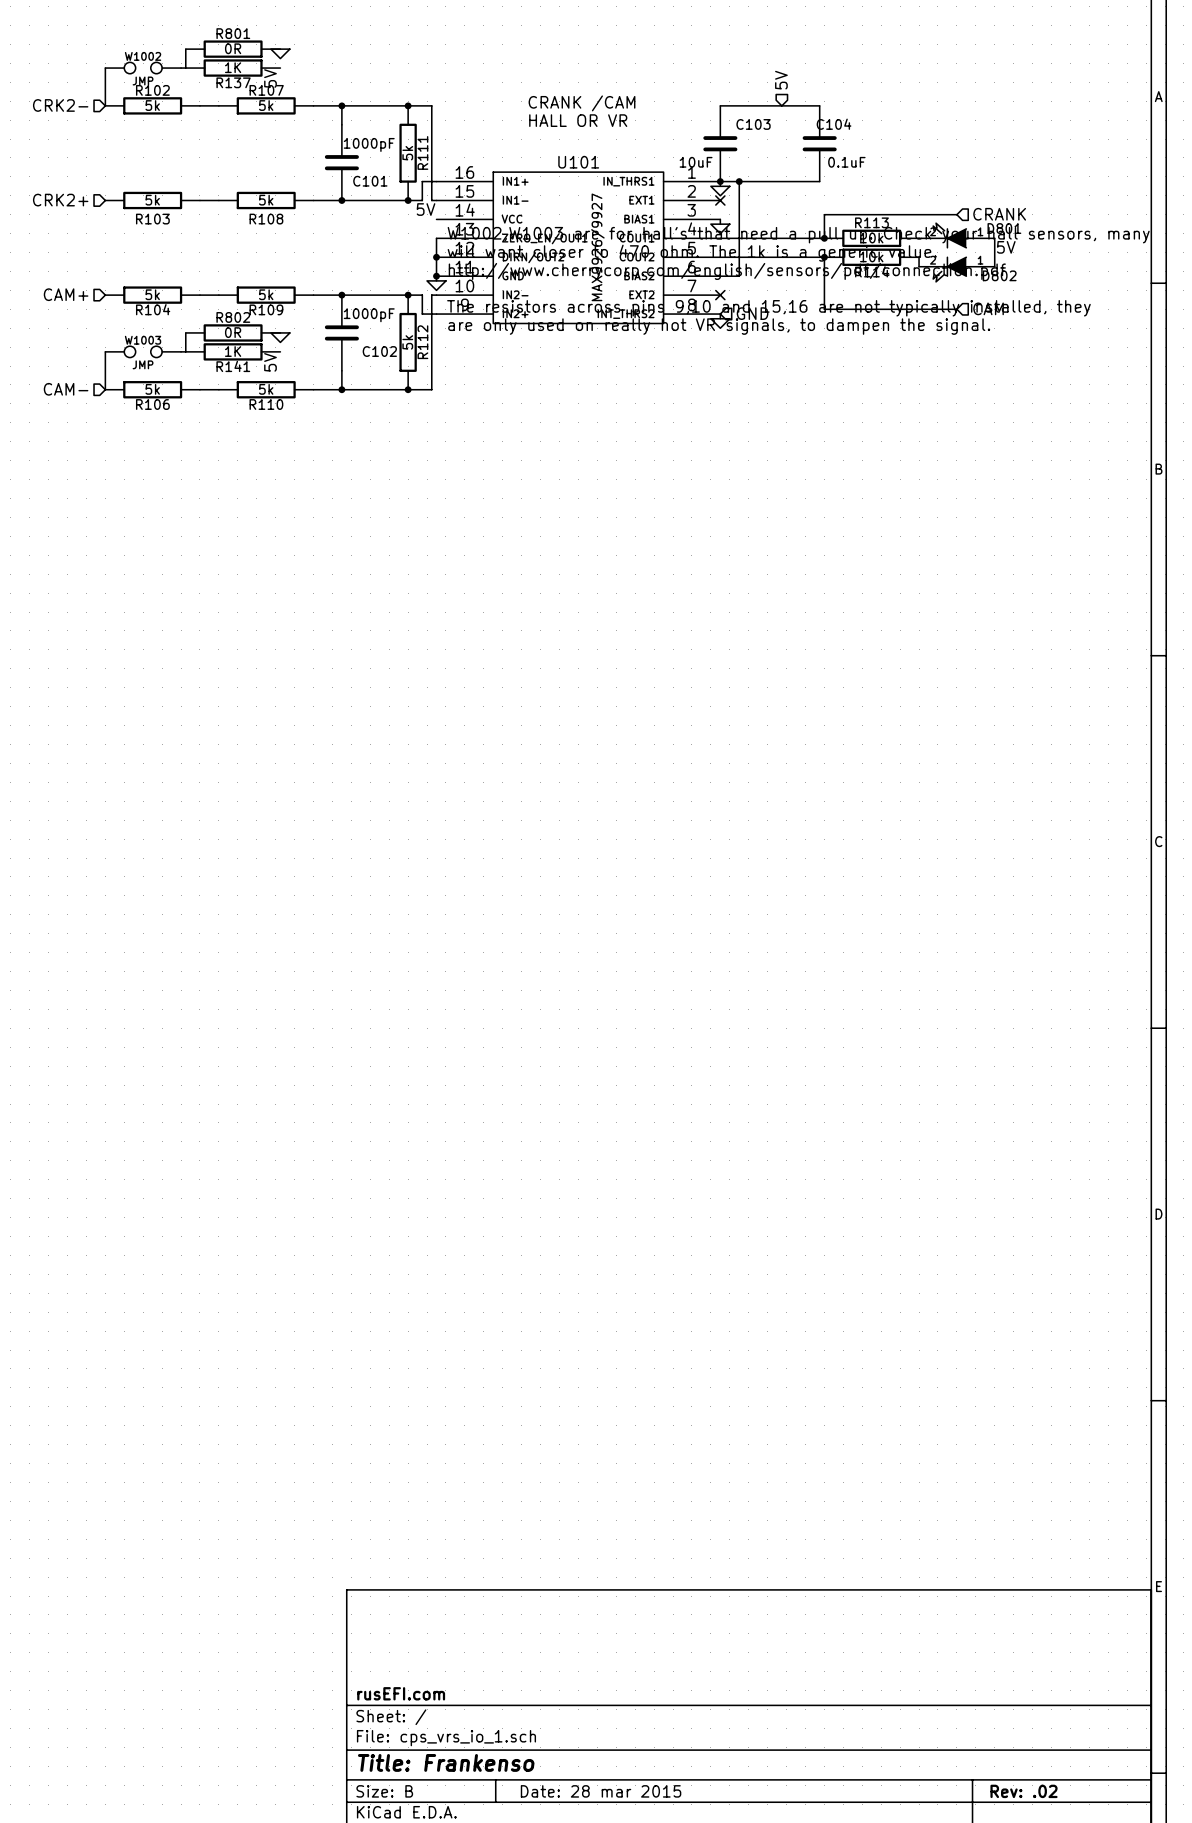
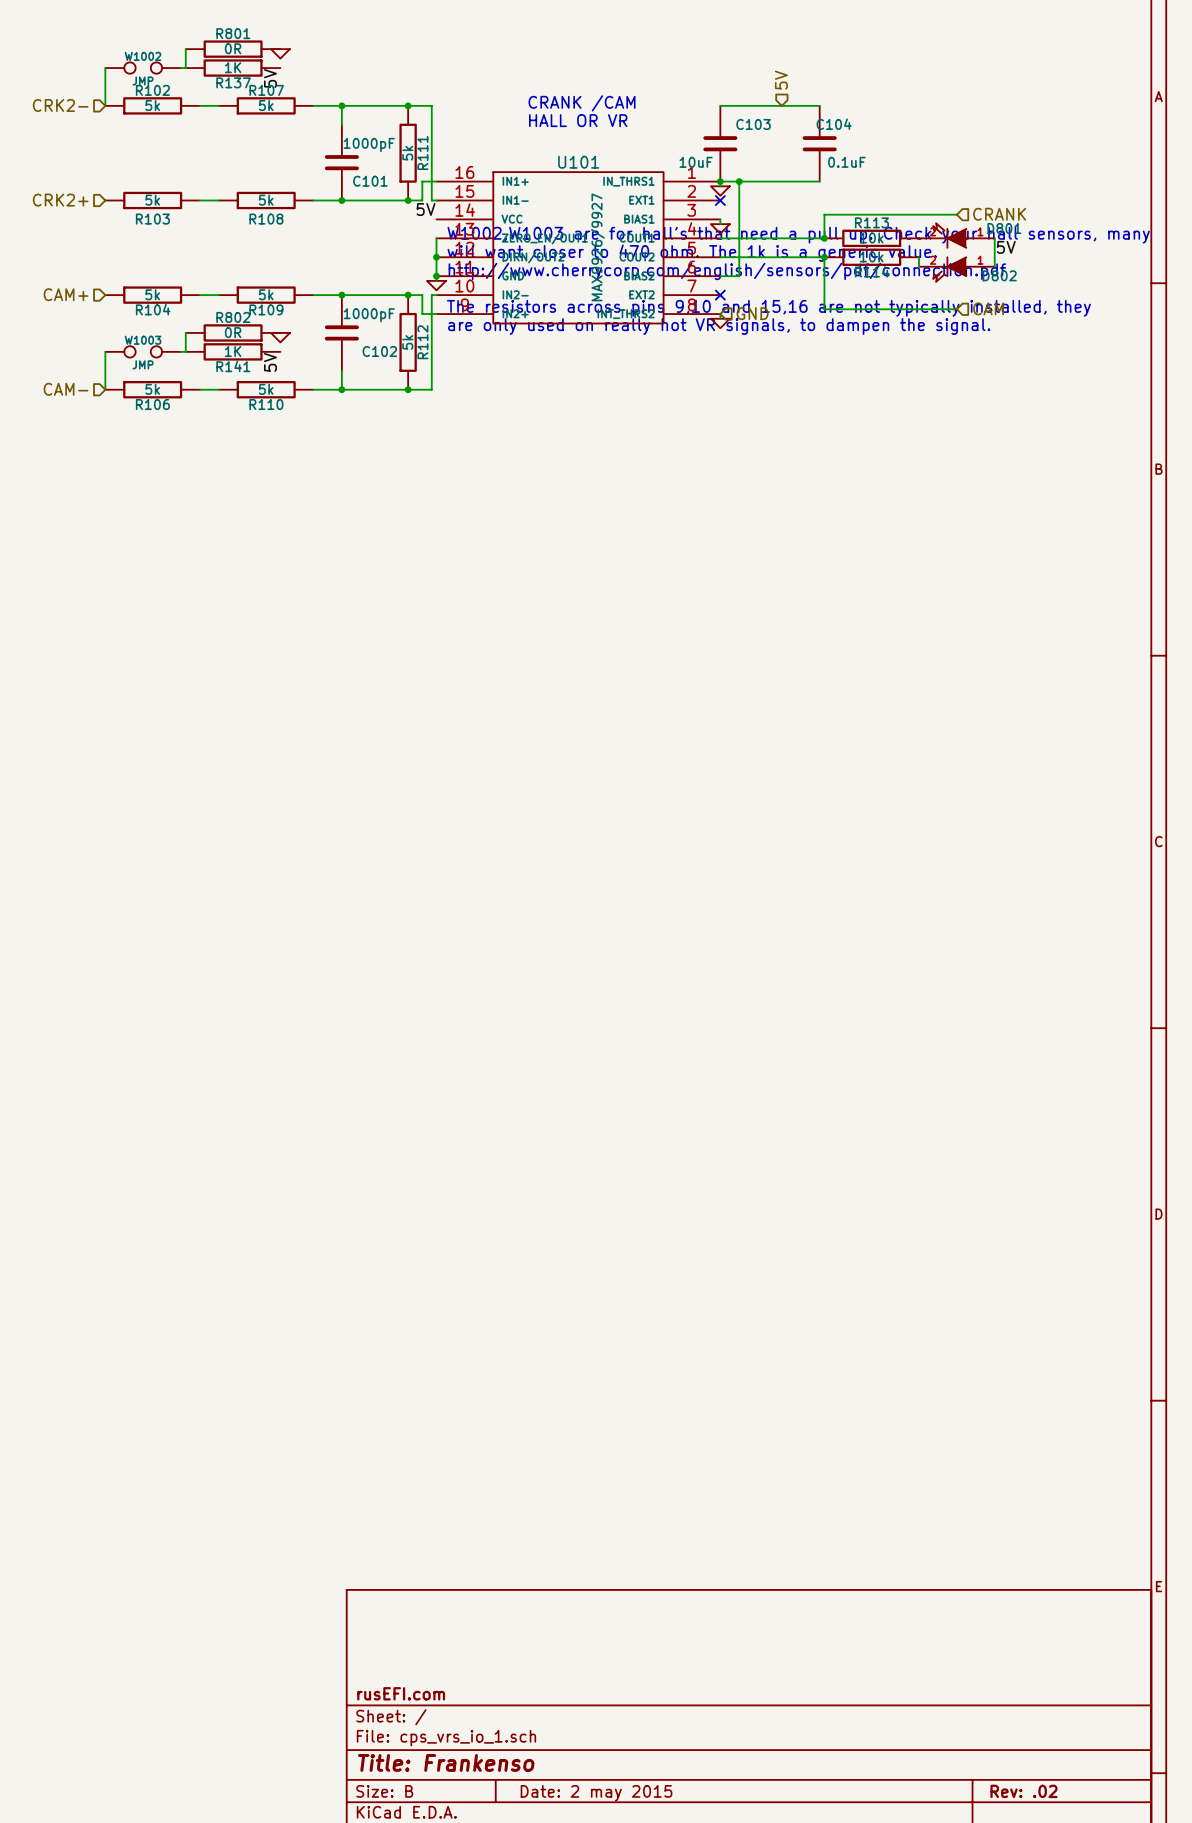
title block: Date: 28 mar 2015 (601, 1791) -> Date: 2 may 2015 (596, 1793)

